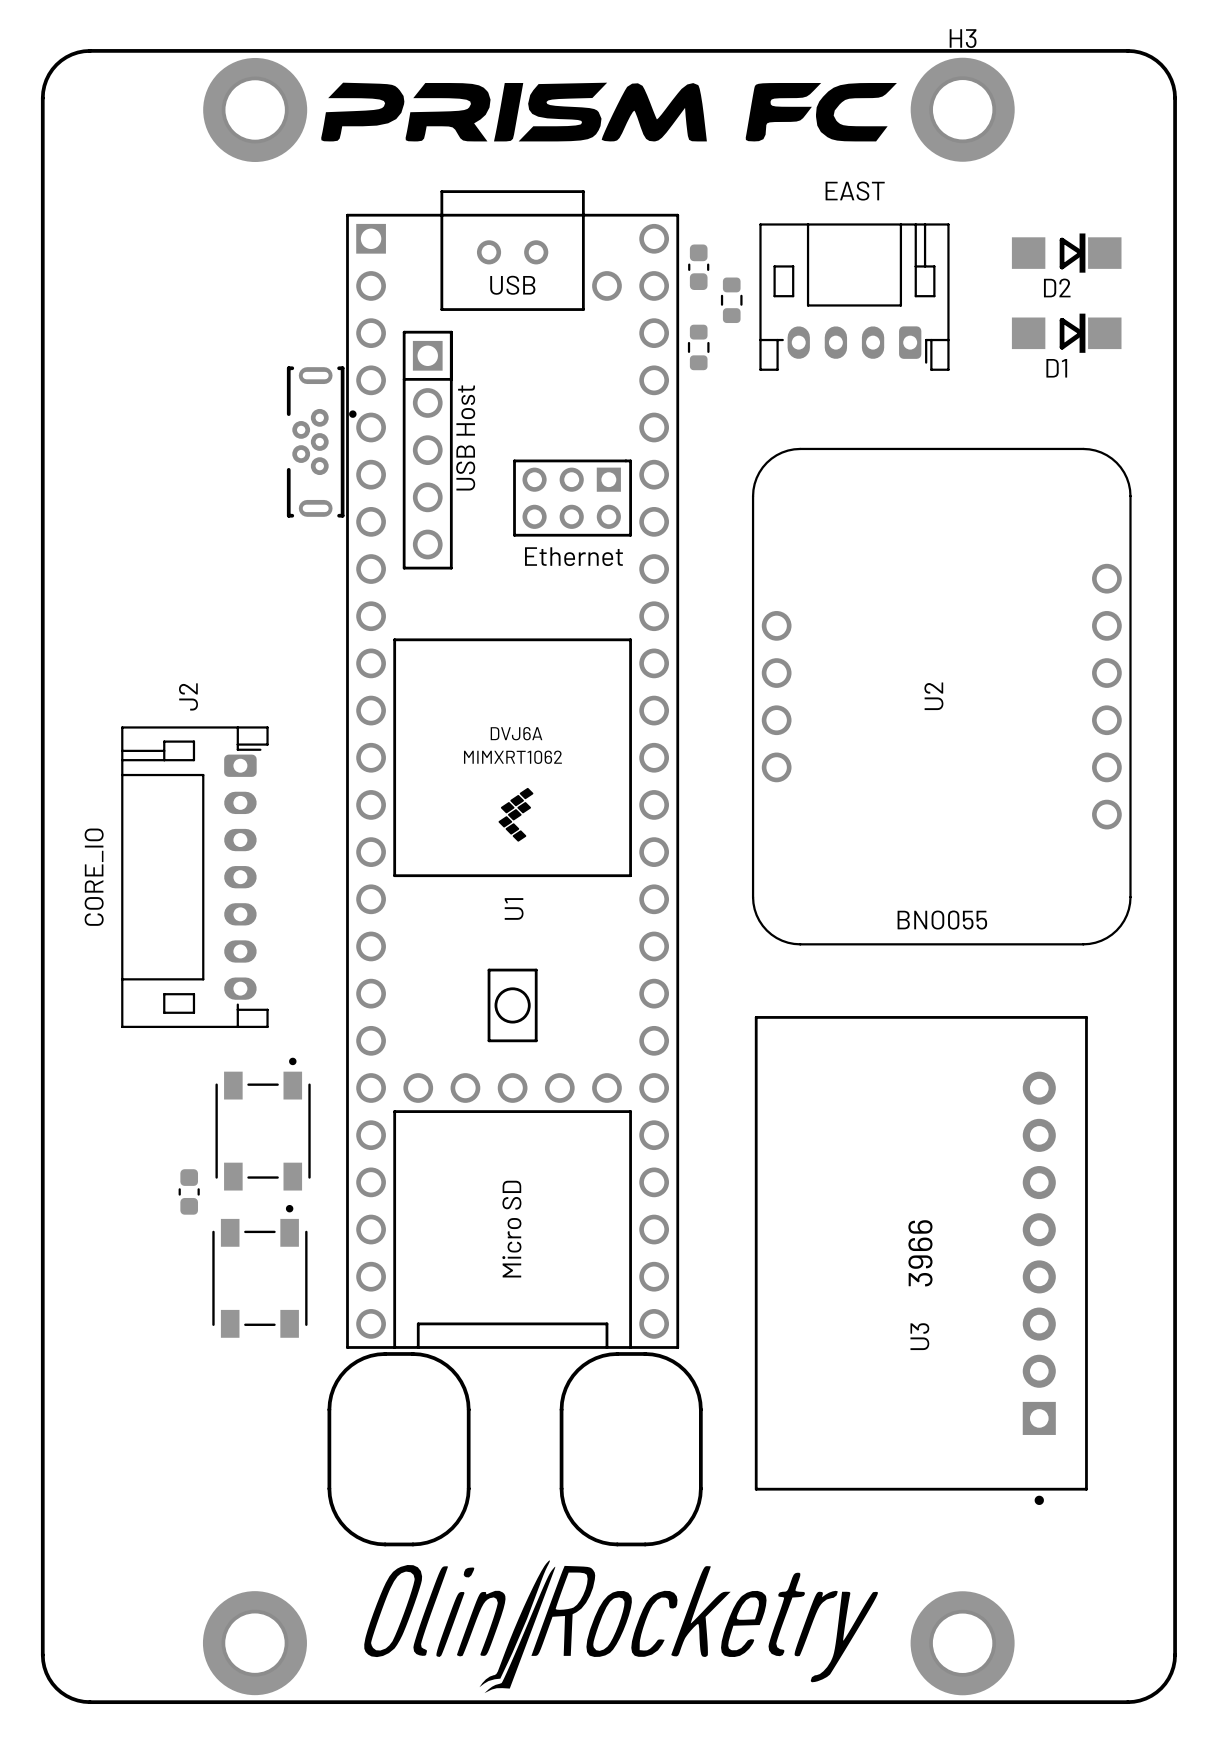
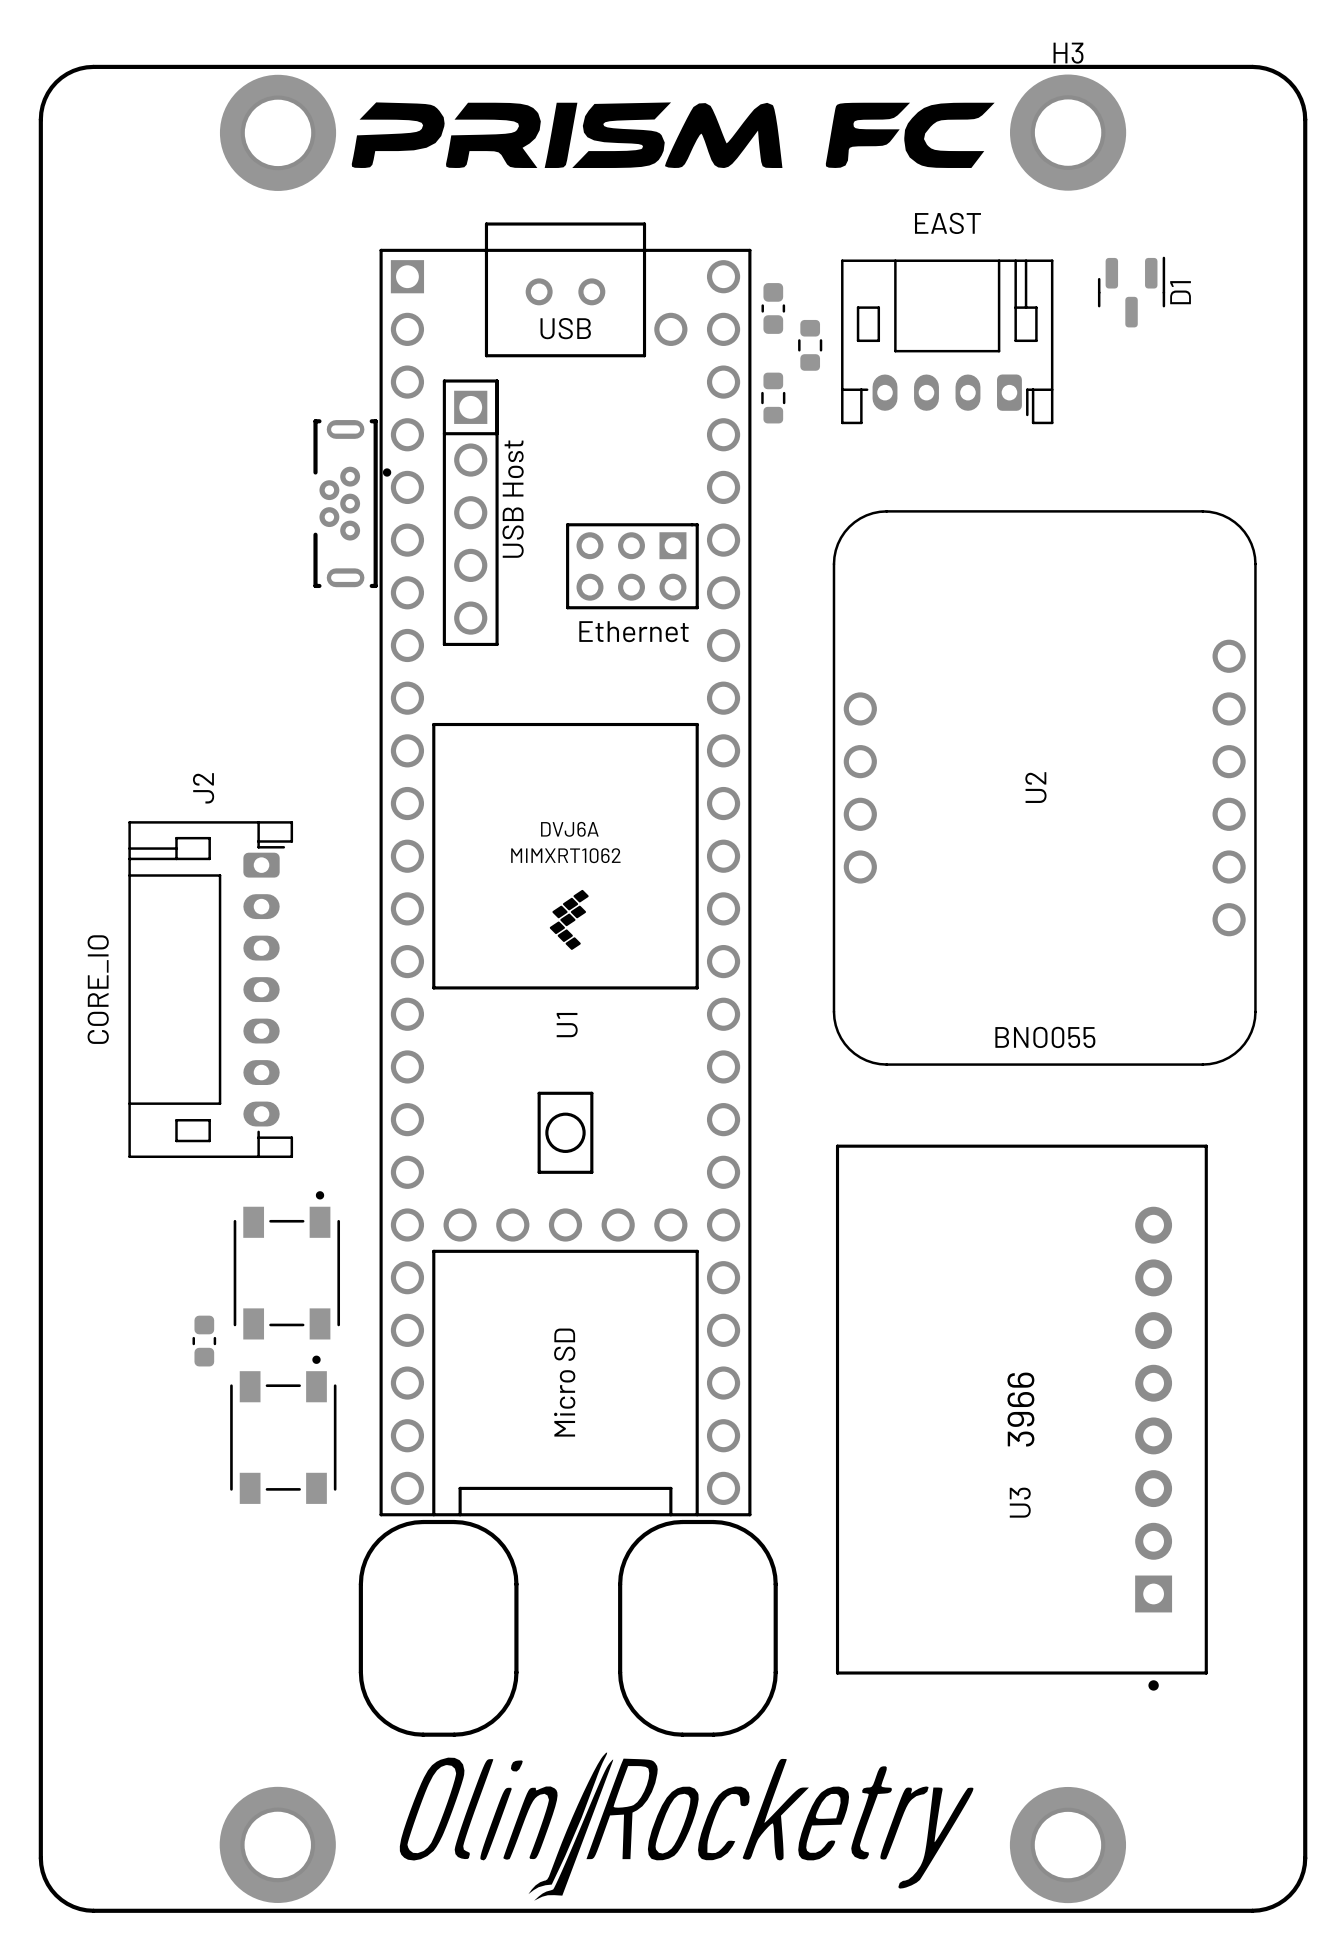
D2: (1066, 253) -> none
D1 footprint: [1011, 313, 1122, 353] -> [1097, 256, 1166, 328]
D1 name position: D1 (1056, 368) -> D1 (1180, 292)

